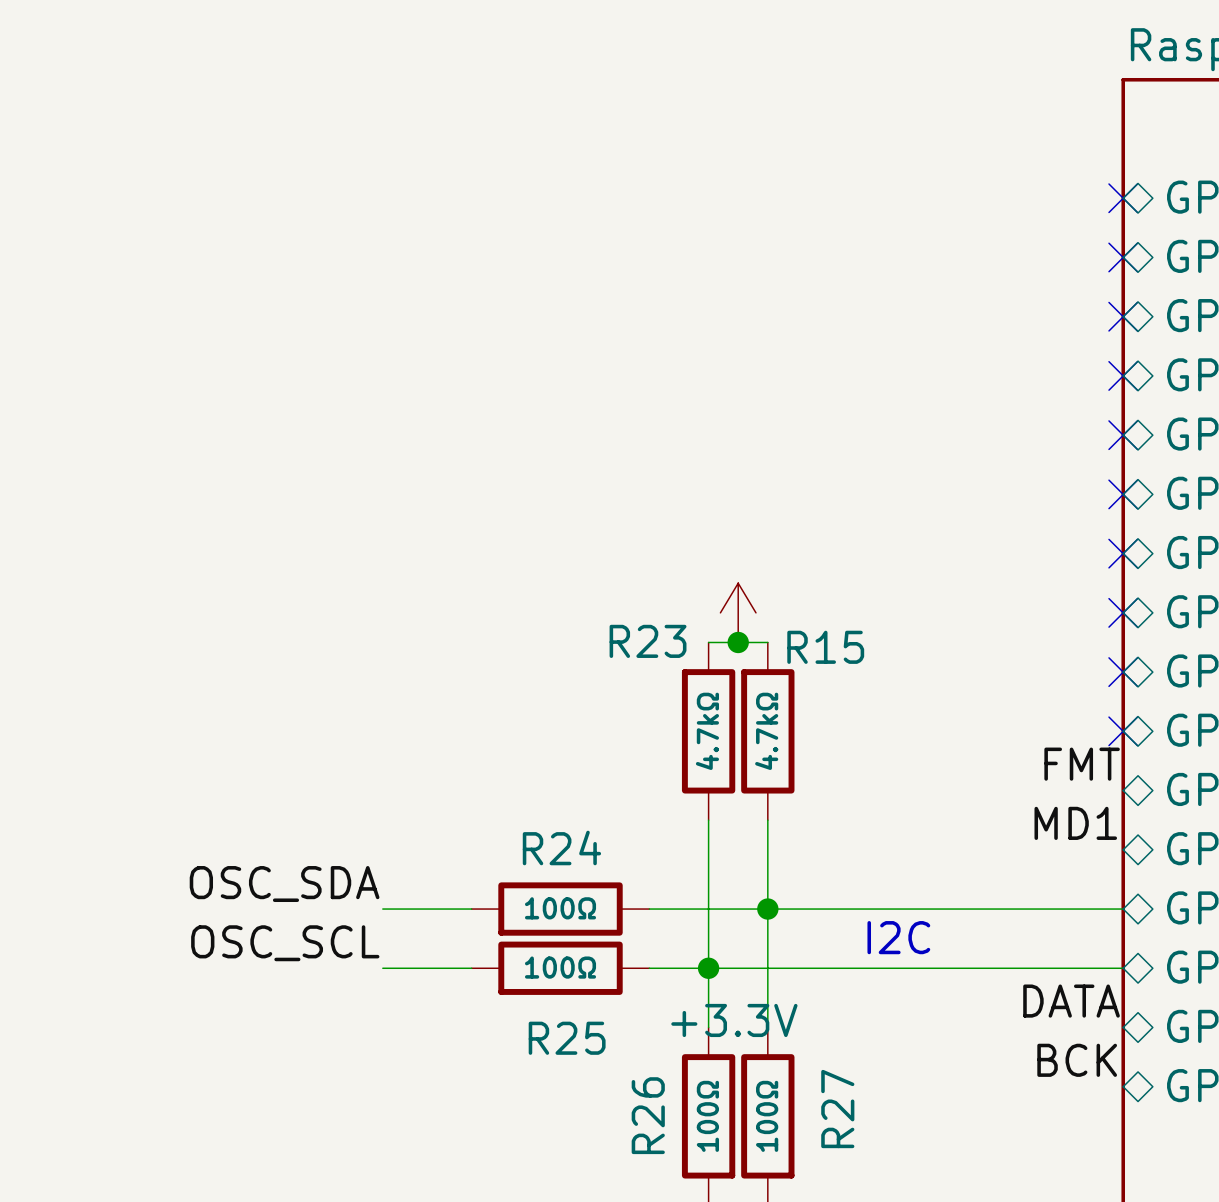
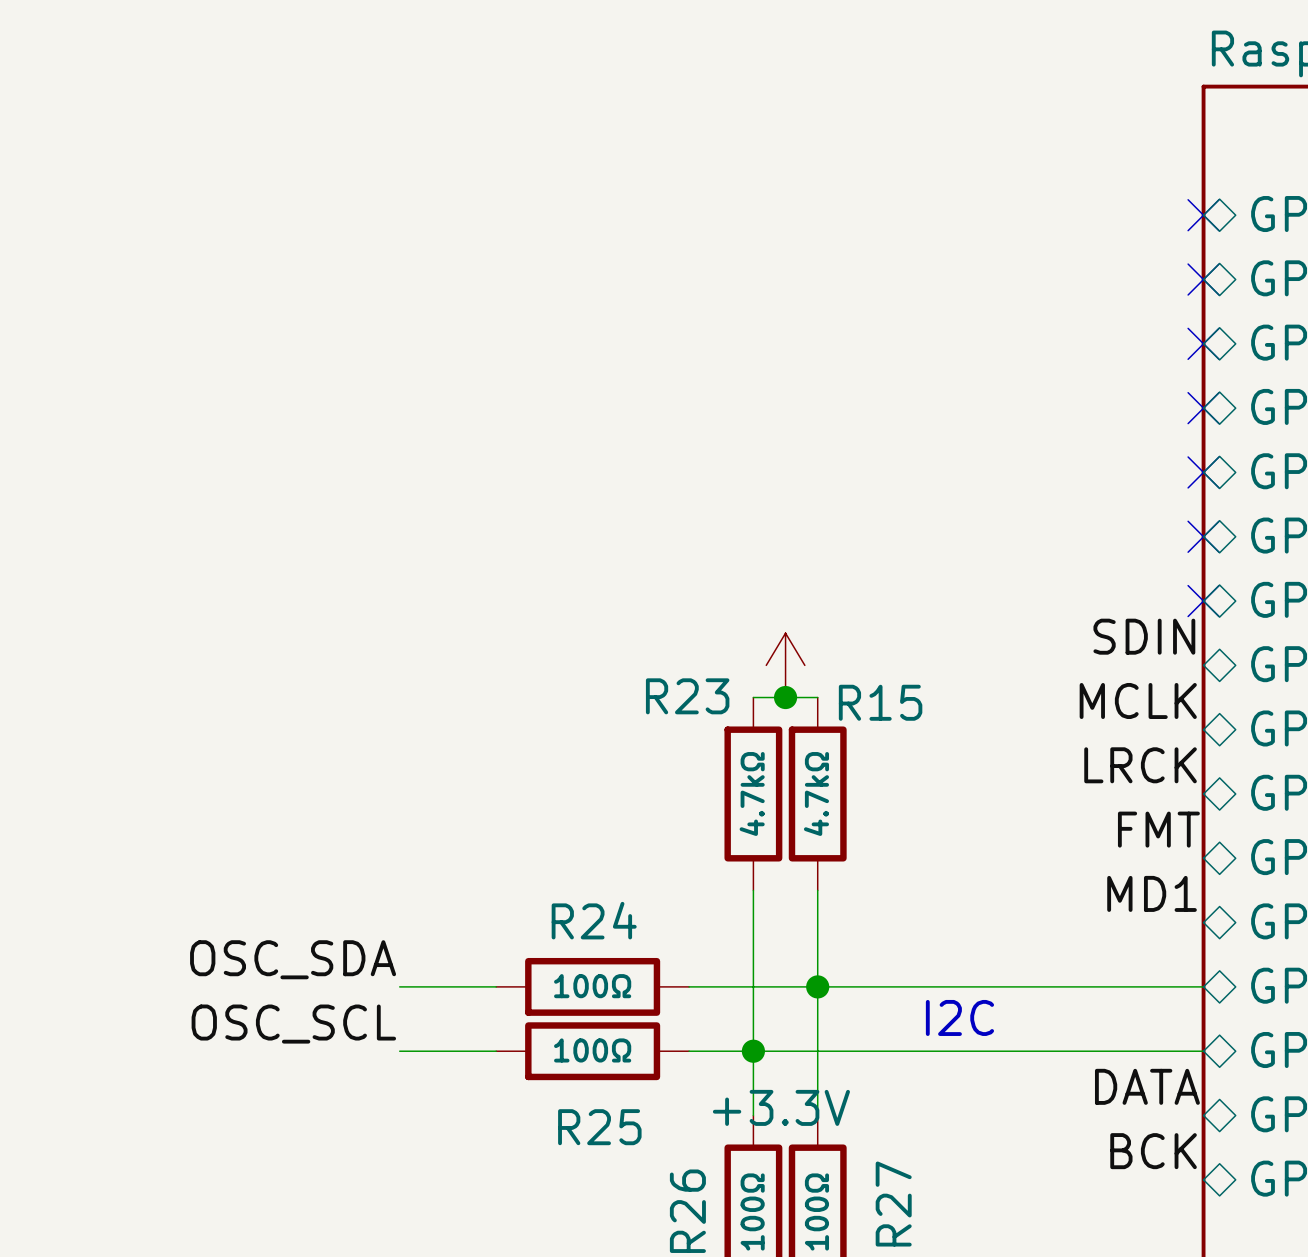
label: none -> SDIN (1144, 636)
no-connect mark: (1123, 612) -> none
label: none -> MCLK (1138, 700)
no-connect mark: (1123, 672) -> none
label: none -> LRCK (1140, 765)
no-connect mark: (1123, 731) -> none

